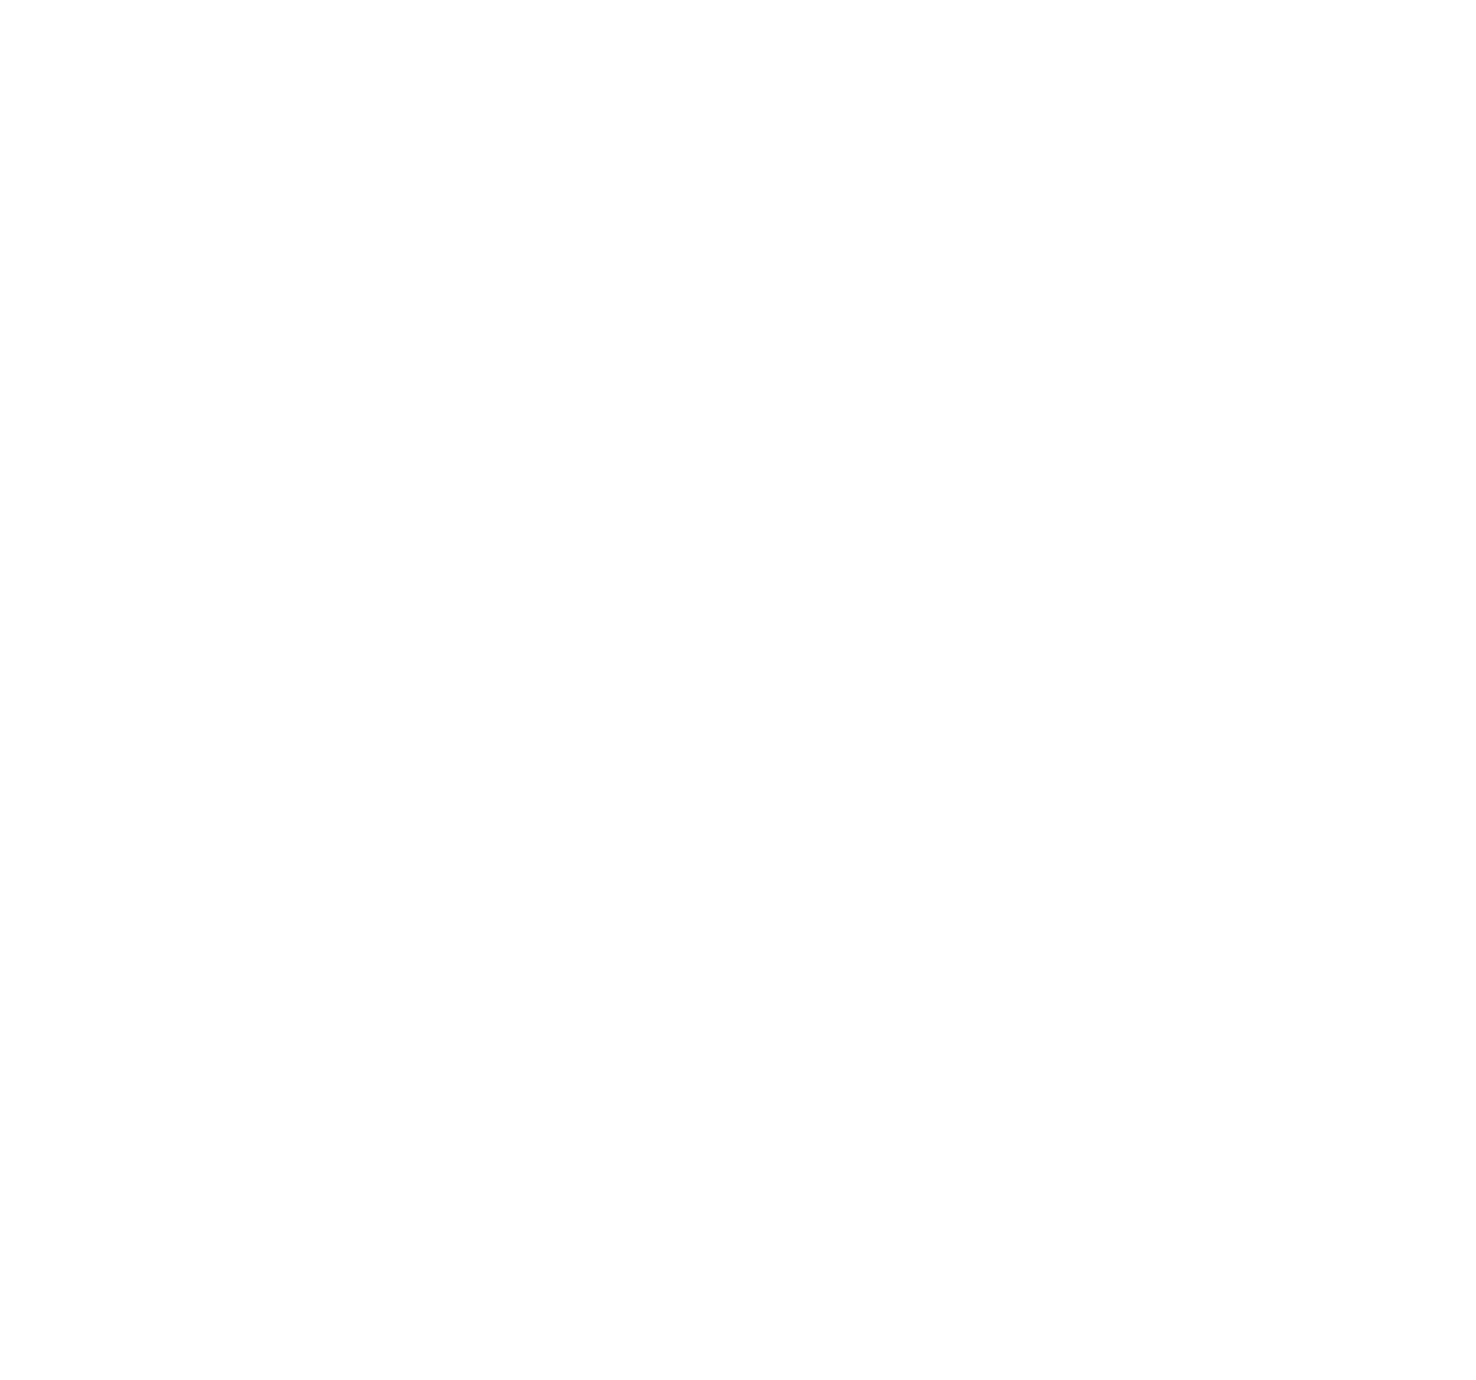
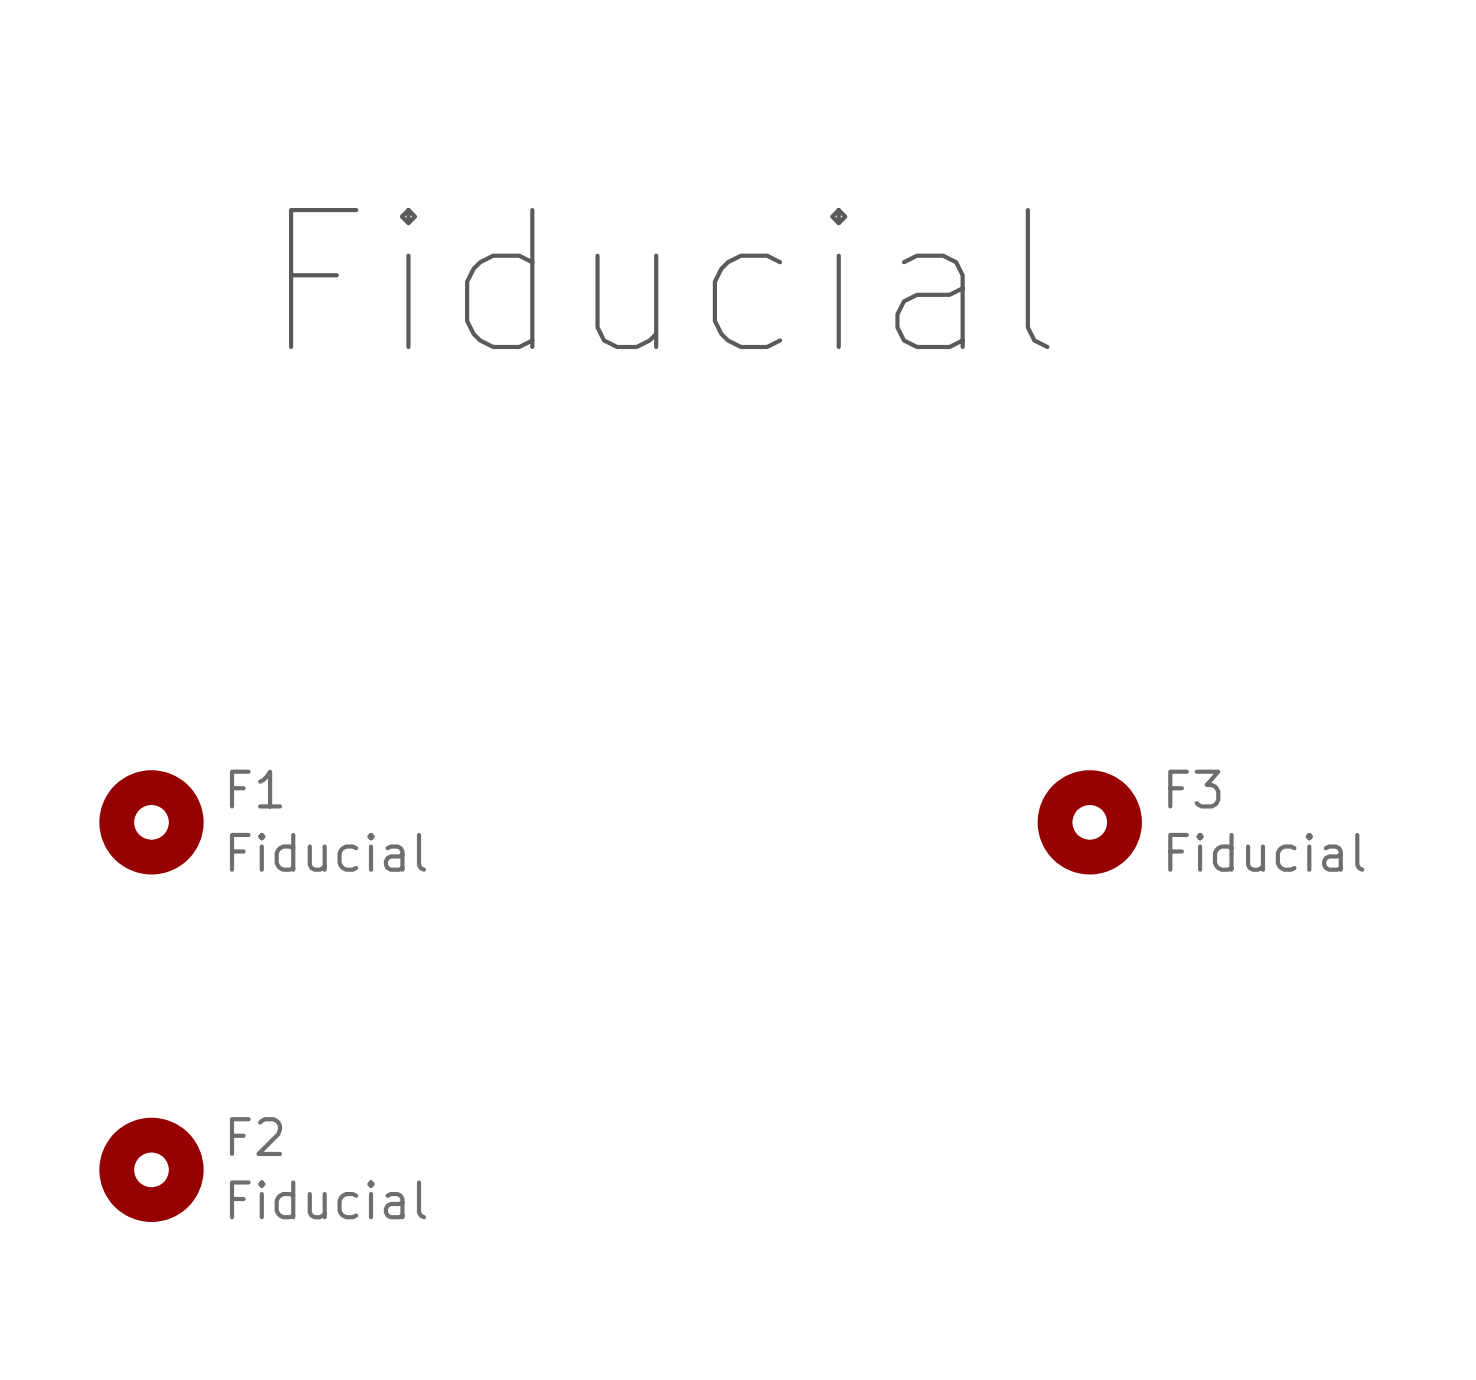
text: none -> Fiducial (669, 278)
F1: none -> Fiducial (151, 822)
F3: none -> Fiducial (1089, 822)
F2: none -> Fiducial (151, 1169)

